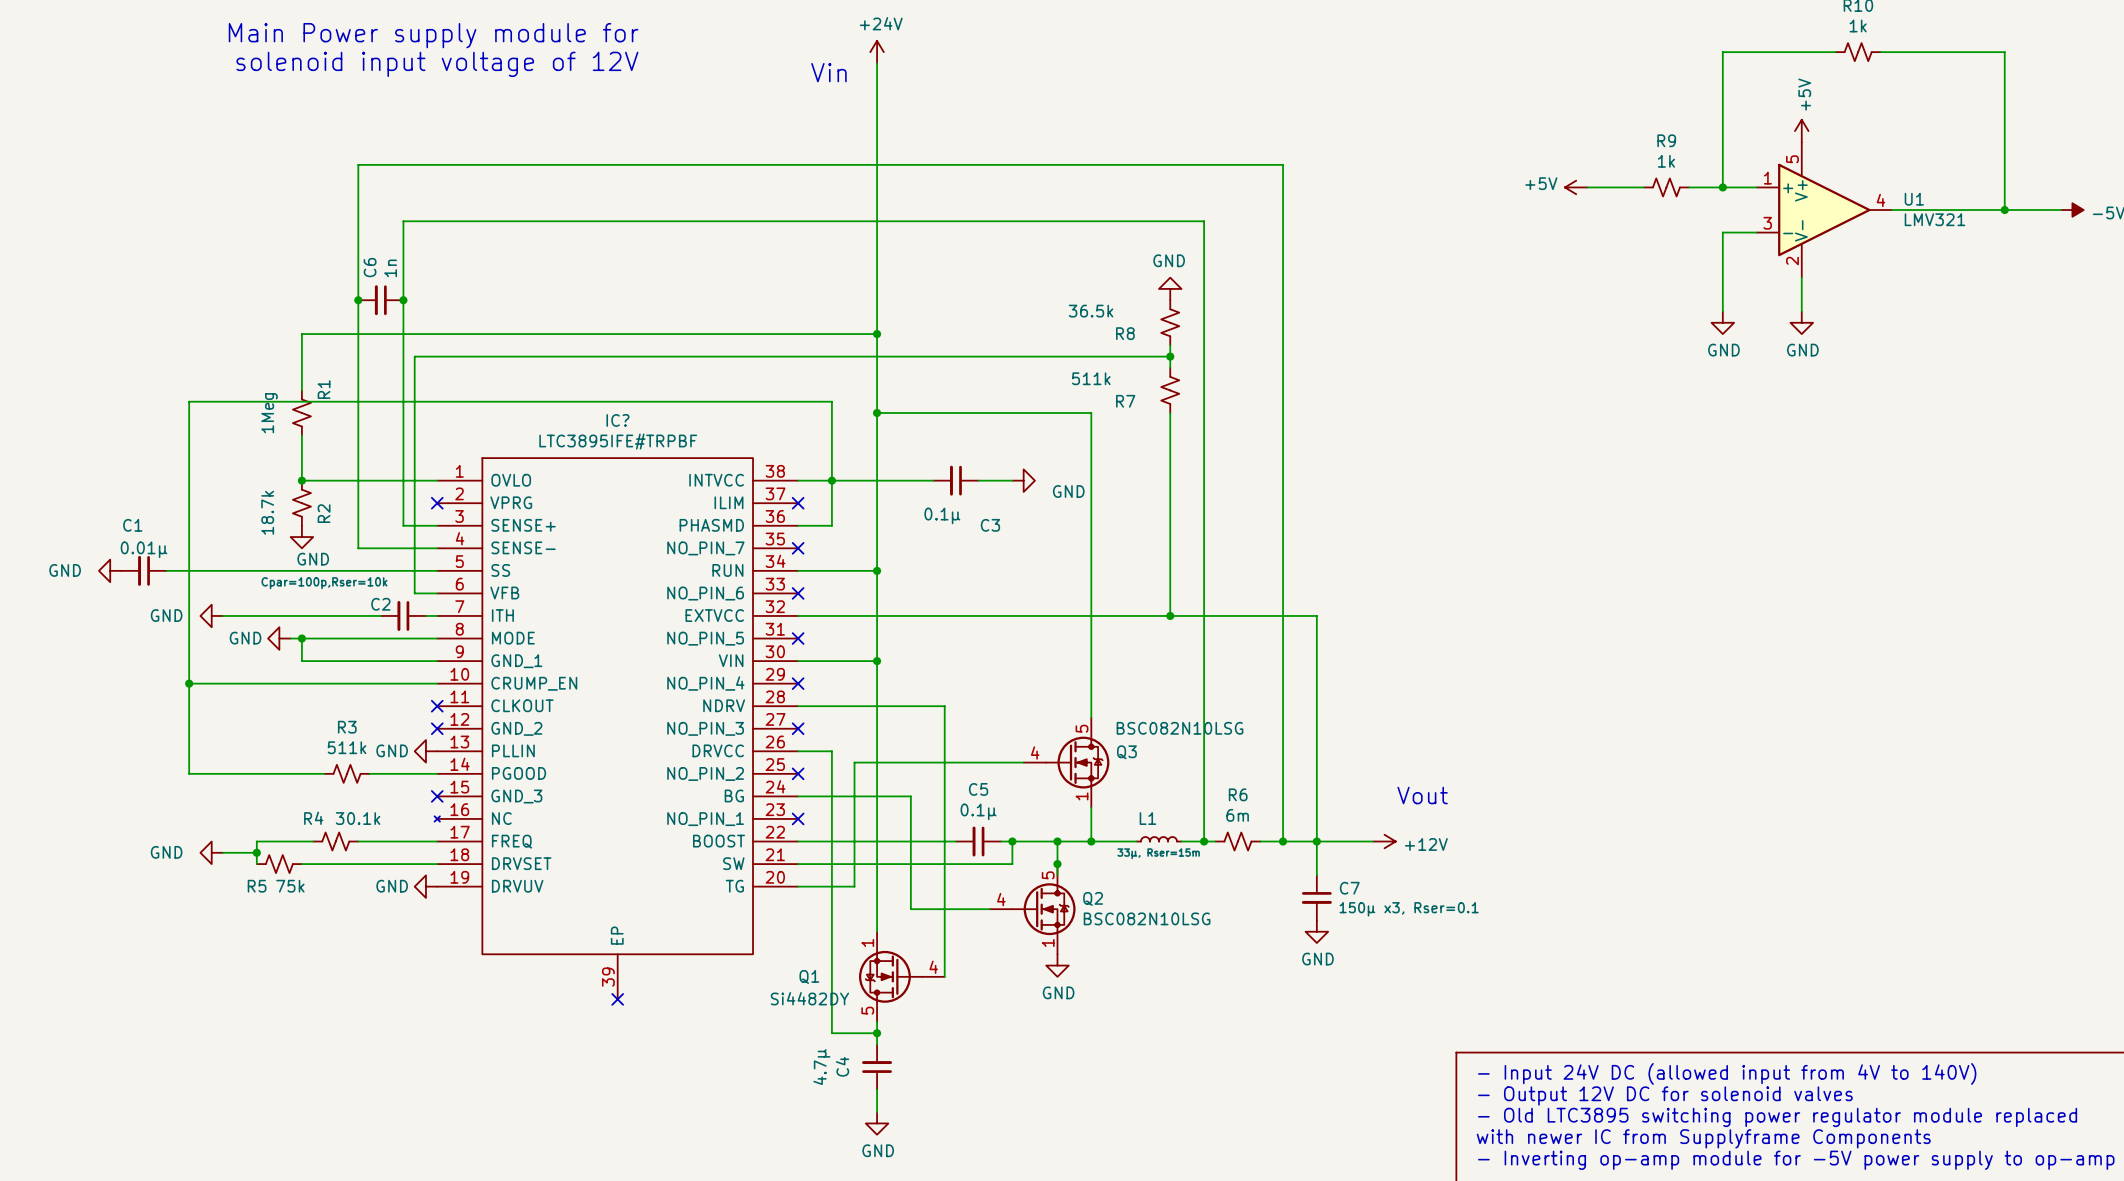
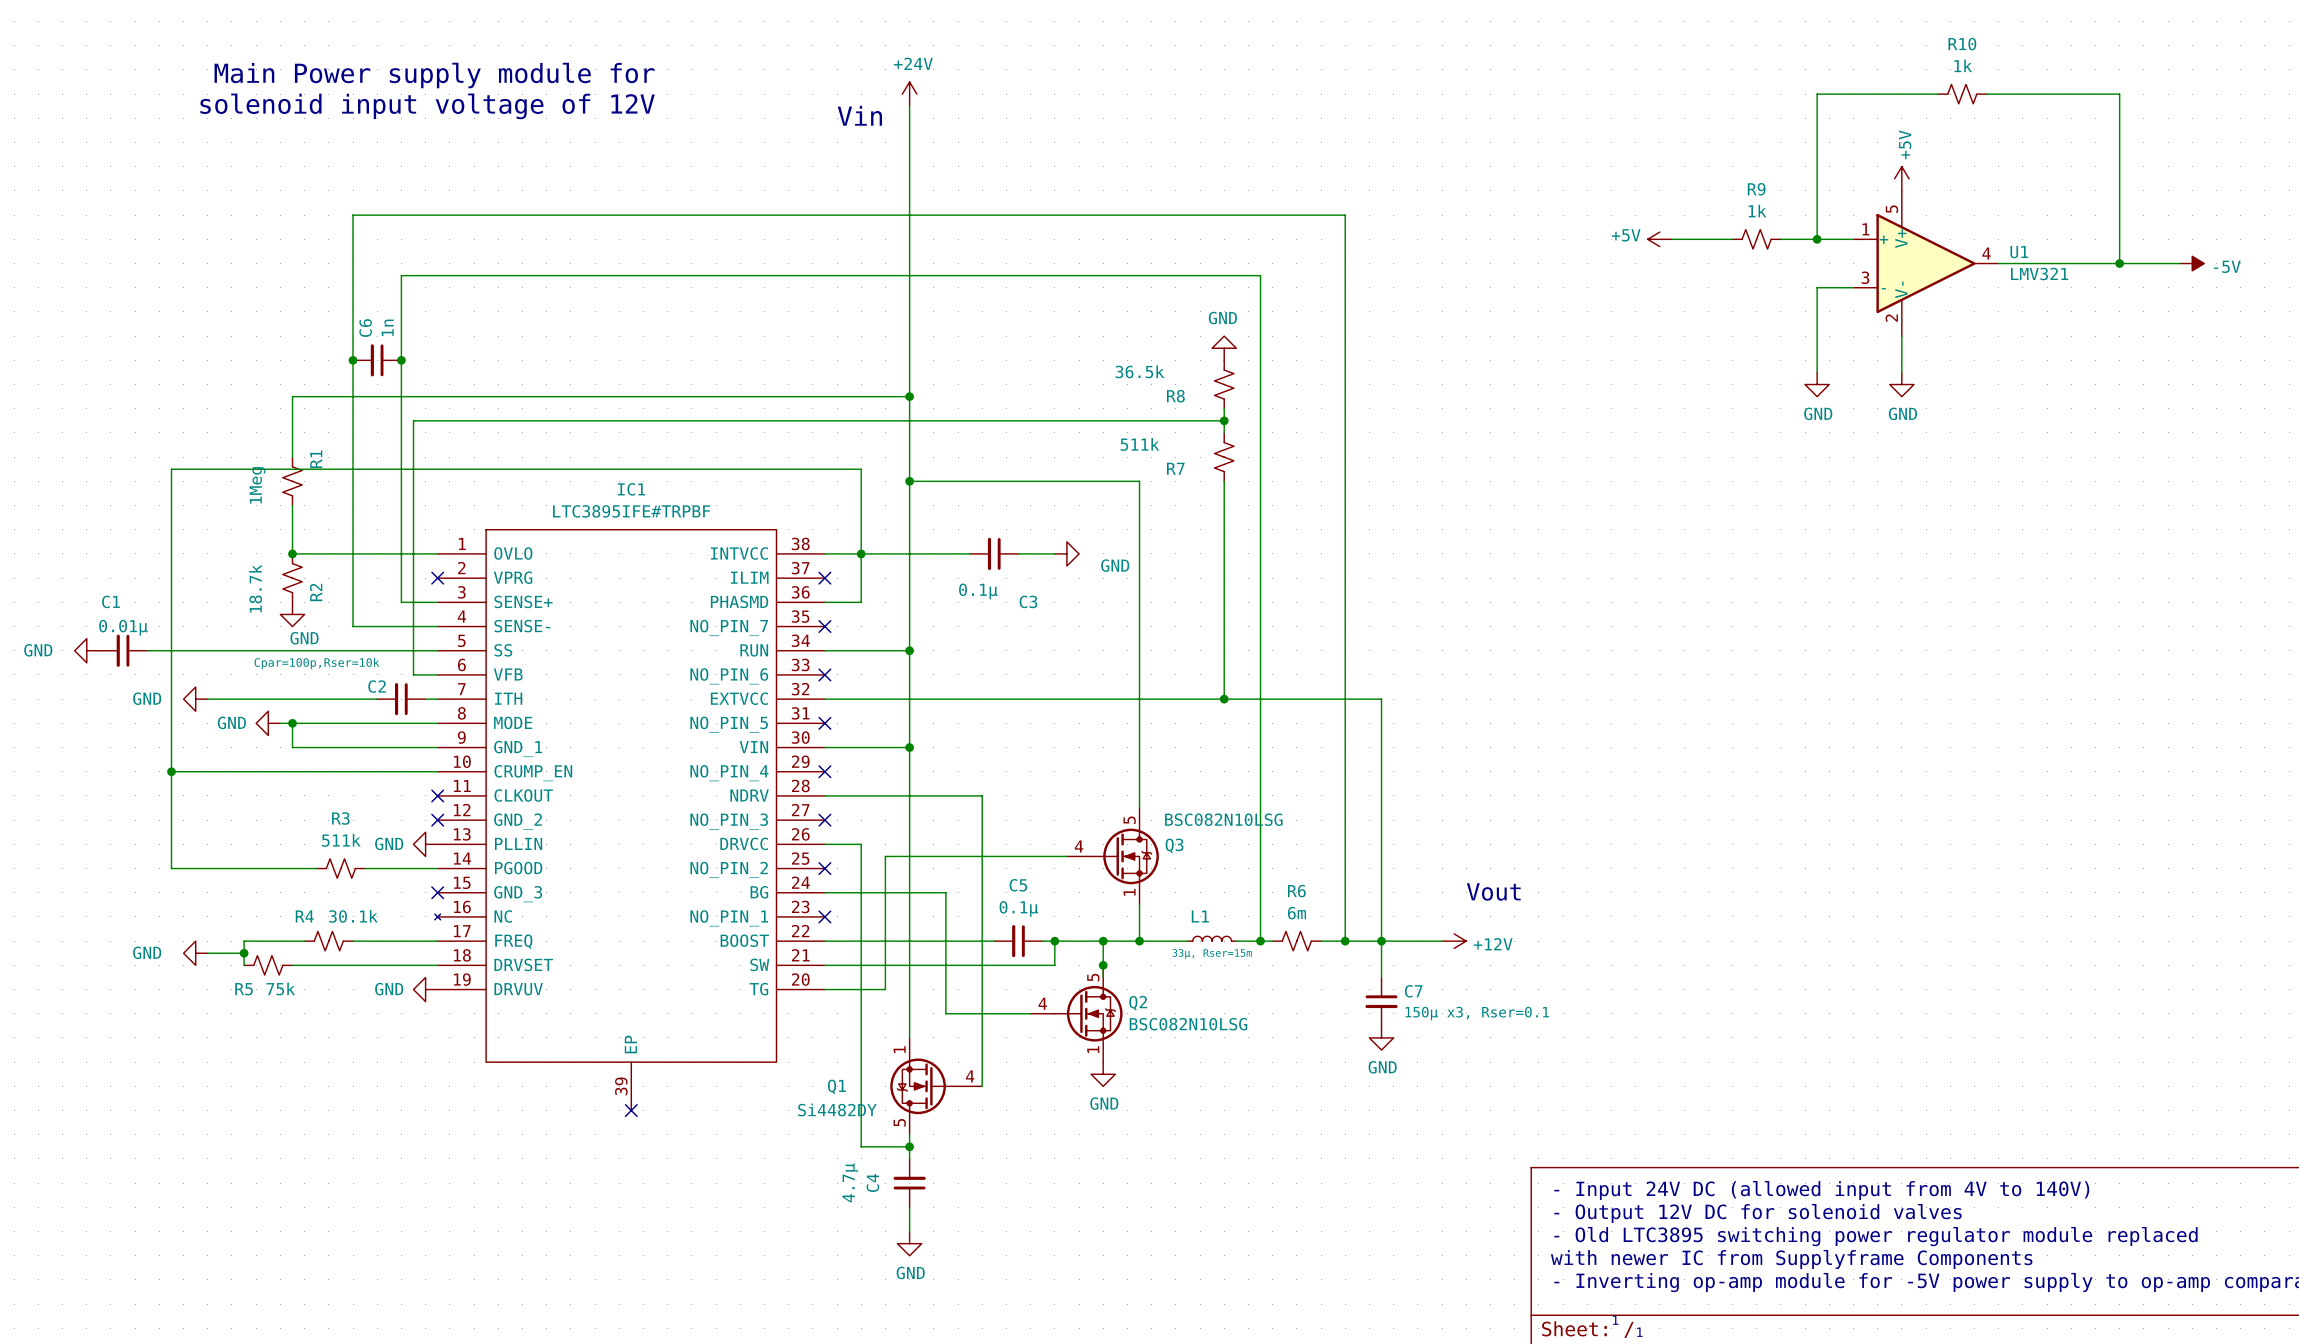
IC? name: IC? (617, 420) -> IC1 (631, 489)

